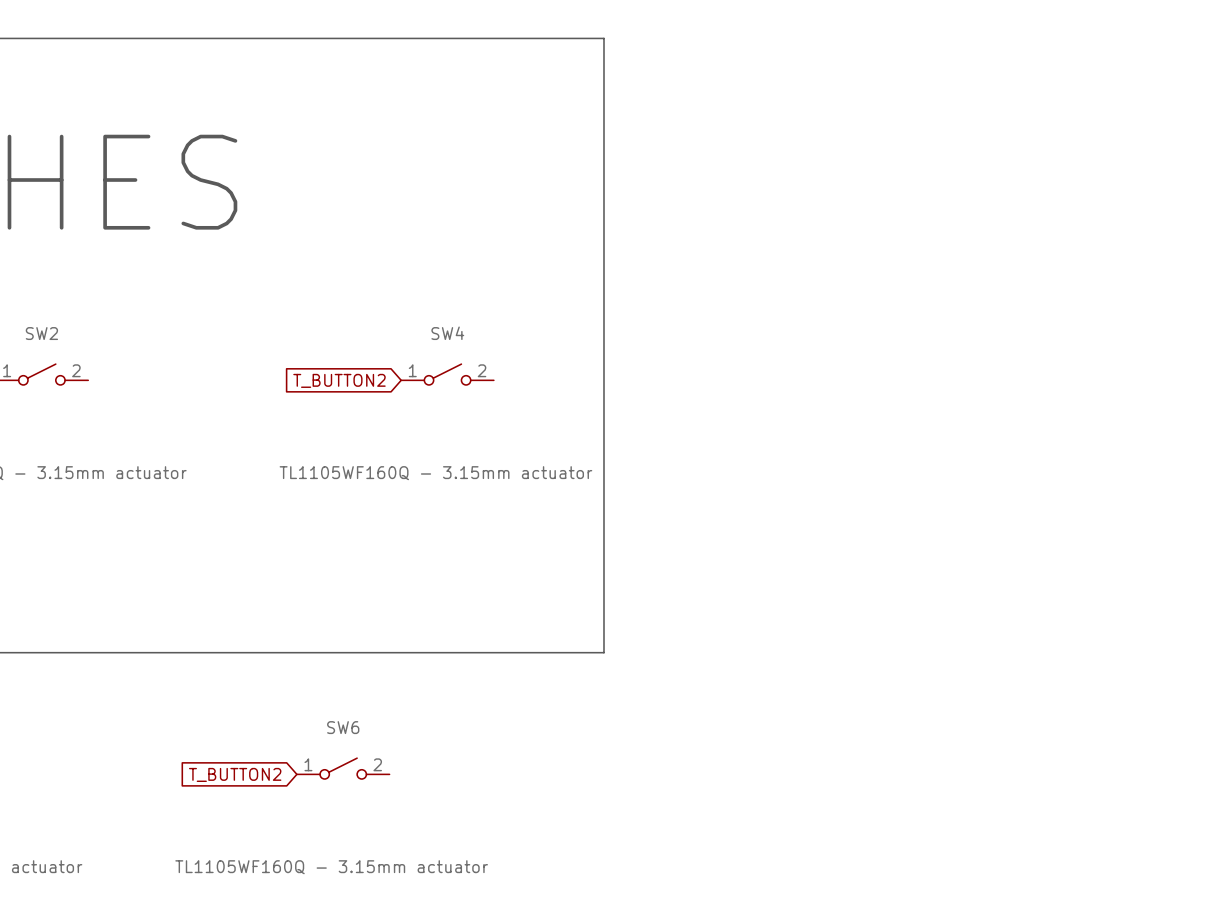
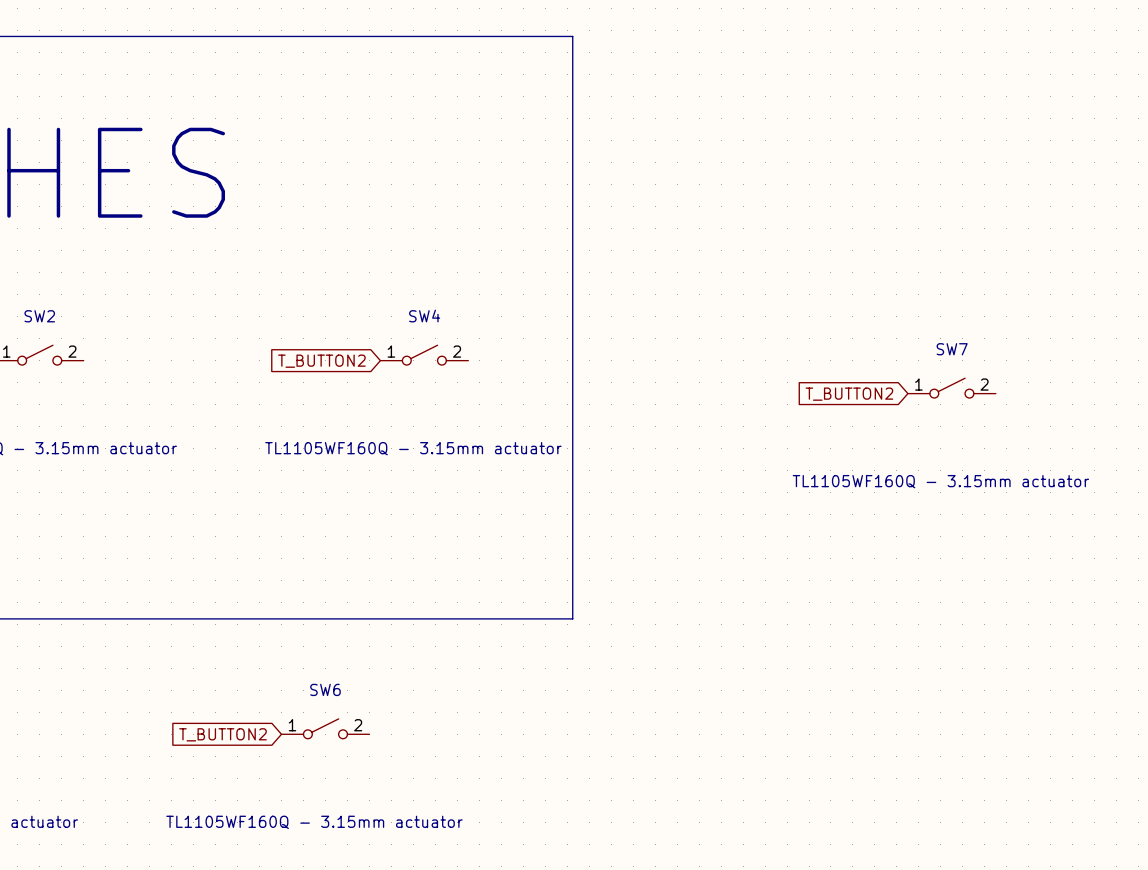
SW7: none -> TL1105WF160Q - 3.15mm actuator (951, 388)
global label: none -> T_BUTTON2 (849, 394)

